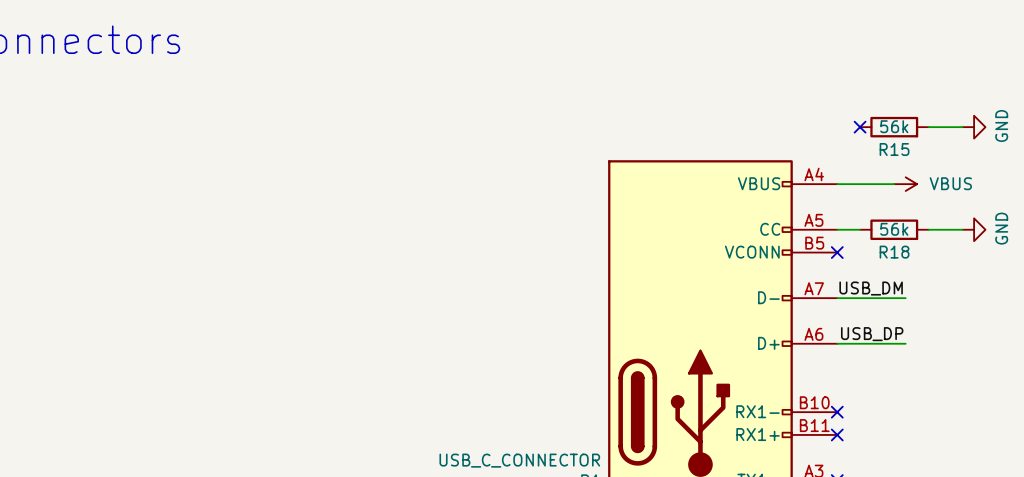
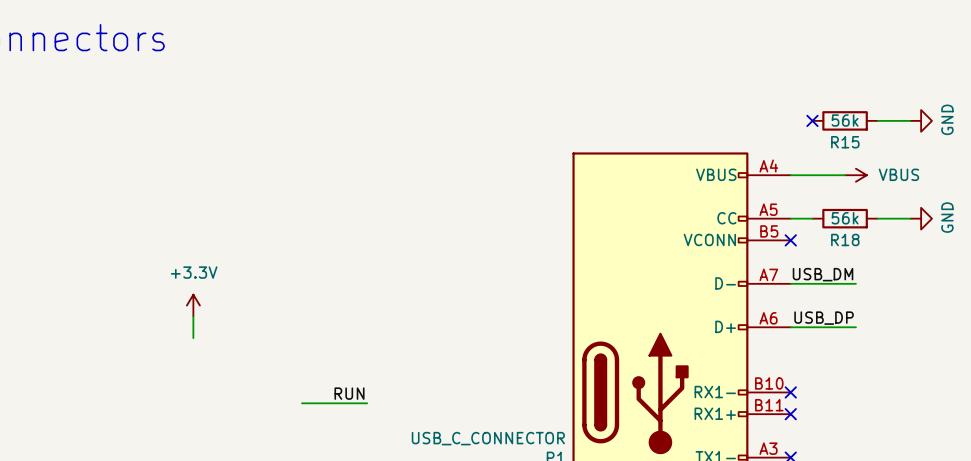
power symbol: none -> +3.3V (193, 305)
wire: none -> (193, 316) (193, 338)
label: none -> RUN (349, 393)
wire: none -> (301, 403) (367, 403)

